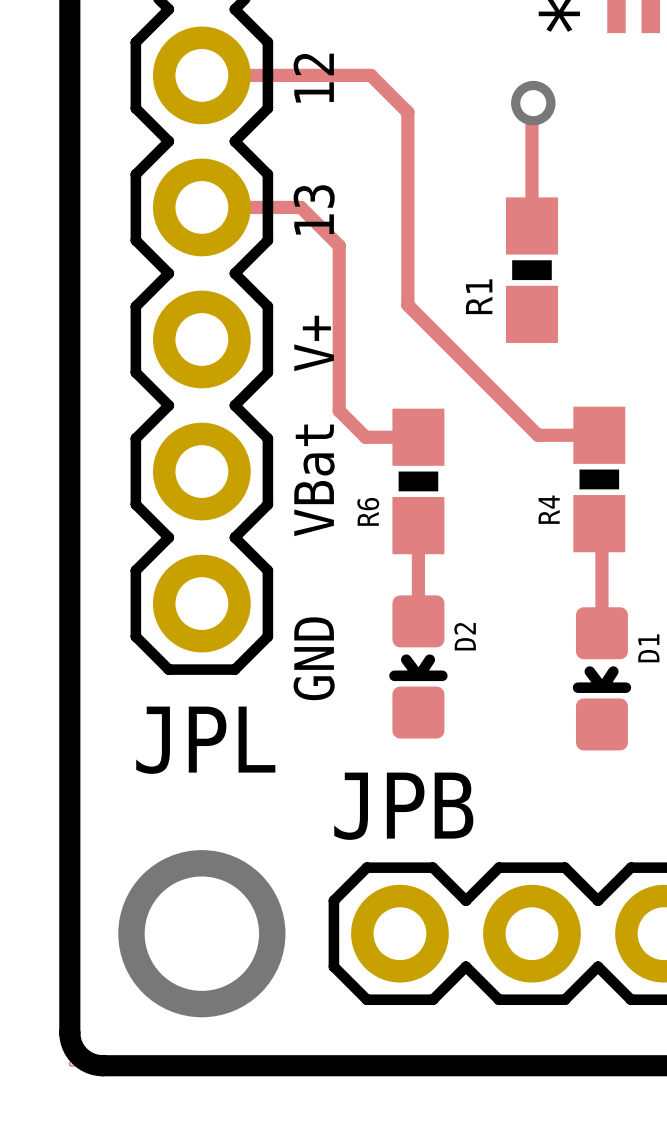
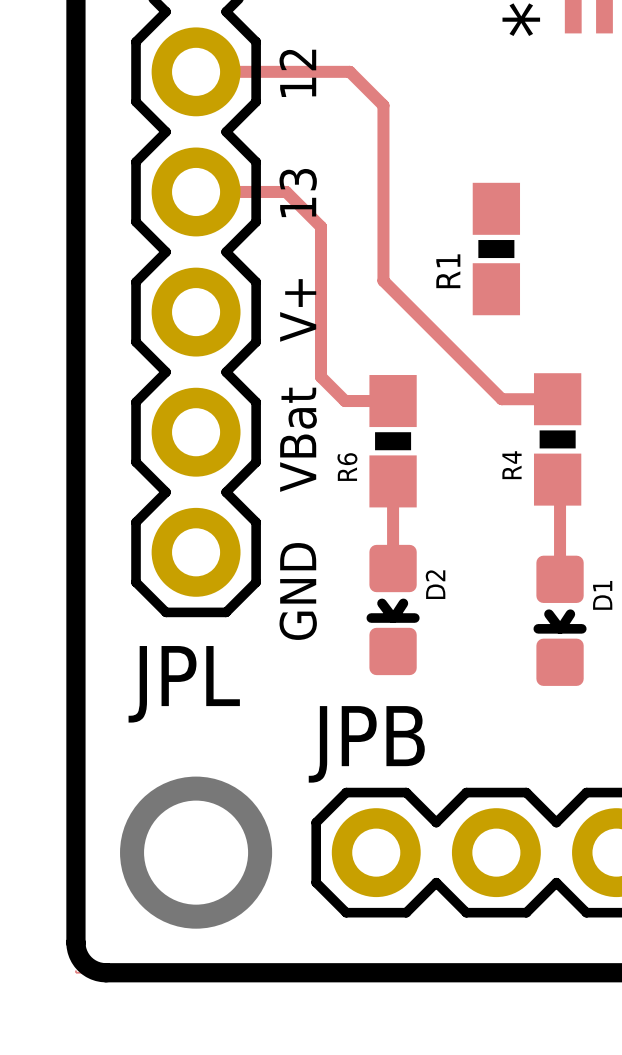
track: (533, 103) (531, 225) -> none
via: (533, 103) -> none

